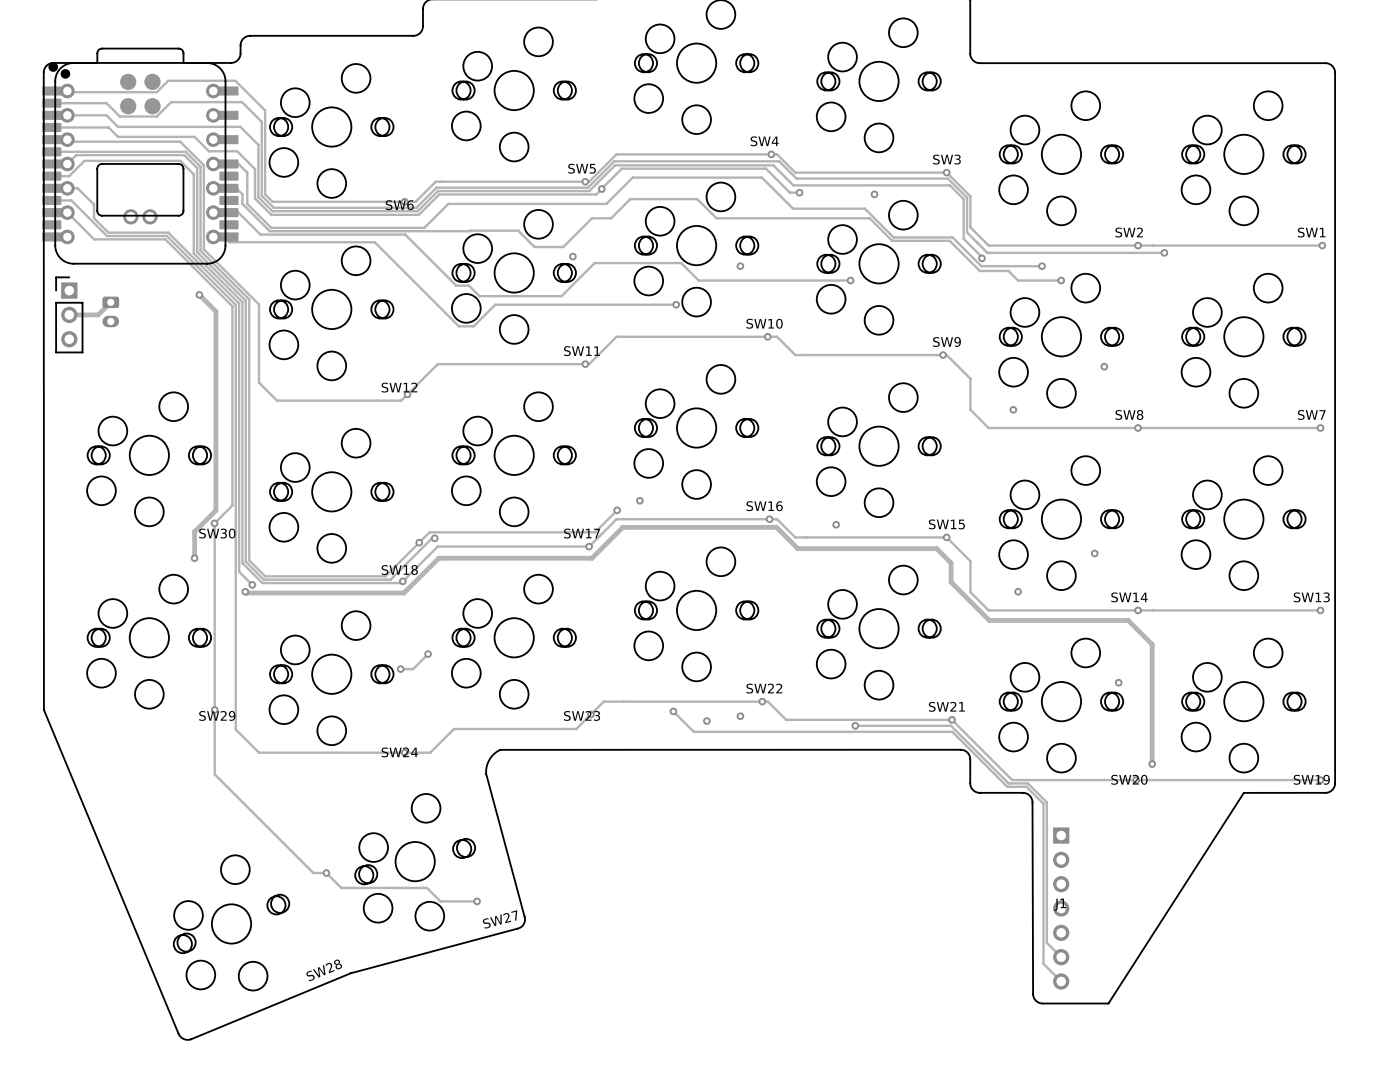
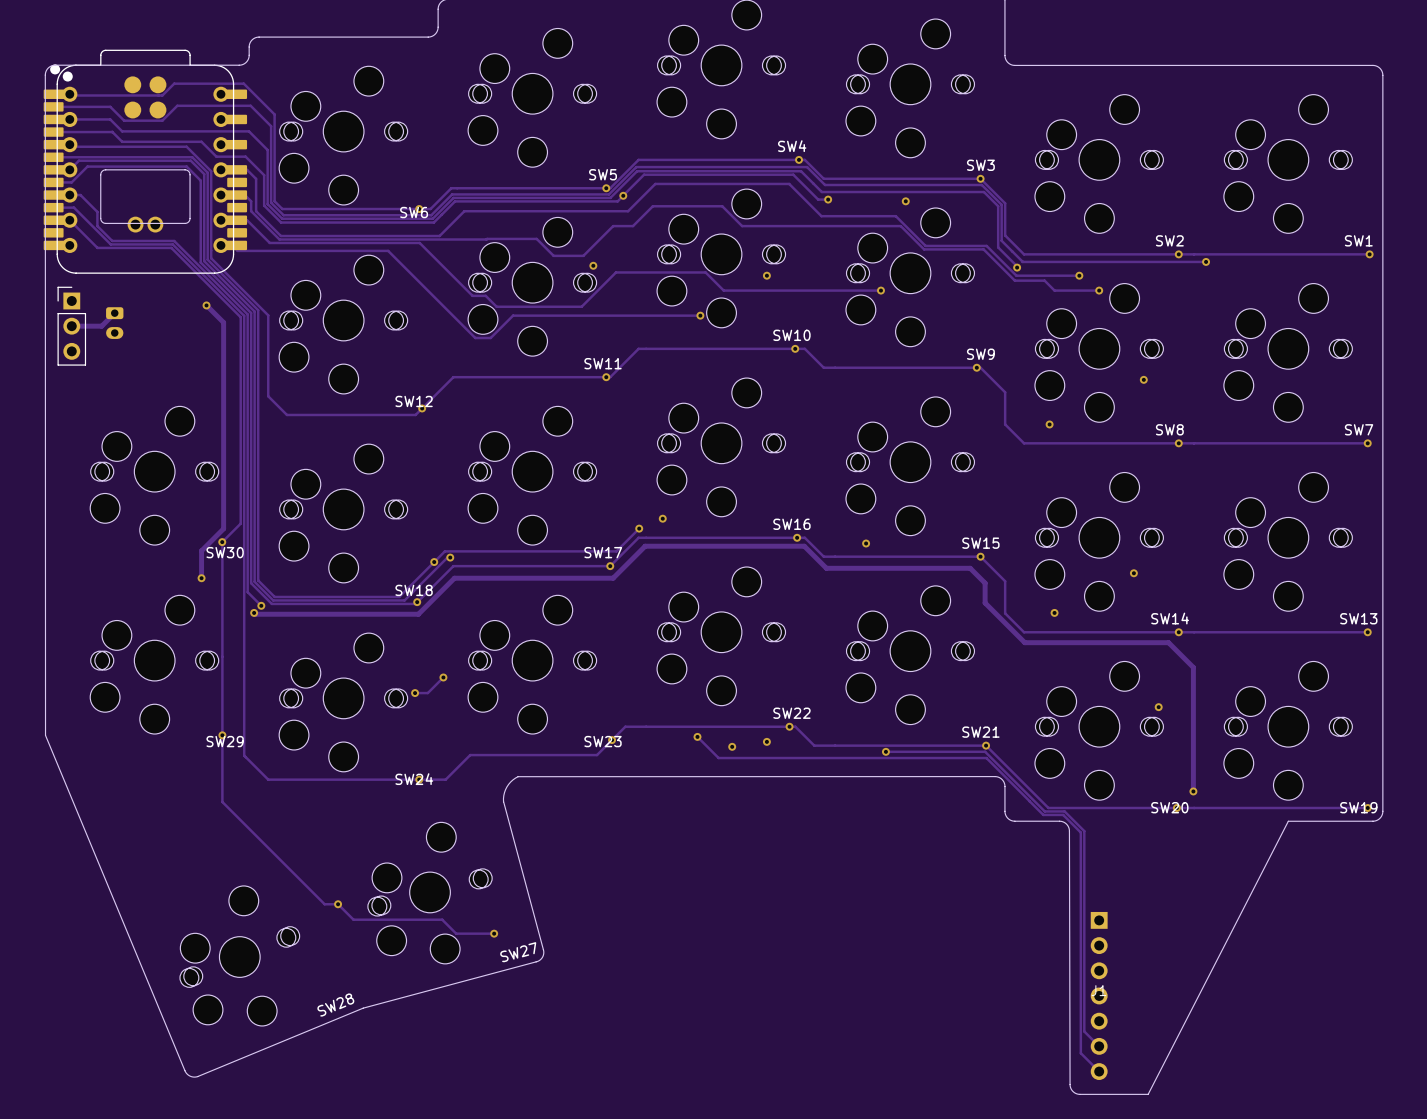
board edge: (1243, 792) (1108, 1003) (1041, 1003) (1033, 997) (1032, 802) -> (1288, 821) (1148, 1094) (1078, 1094) (1073, 1092) (1070, 1087) (1069, 831)
J1 position: (1061, 908) -> (1099, 995)
track: (1046, 942) (1061, 957) -> (1084, 976) (1084, 1031) (1099, 1046)
track: (1043, 963) (1061, 981) -> (1080, 998) (1080, 1053) (1099, 1071)

